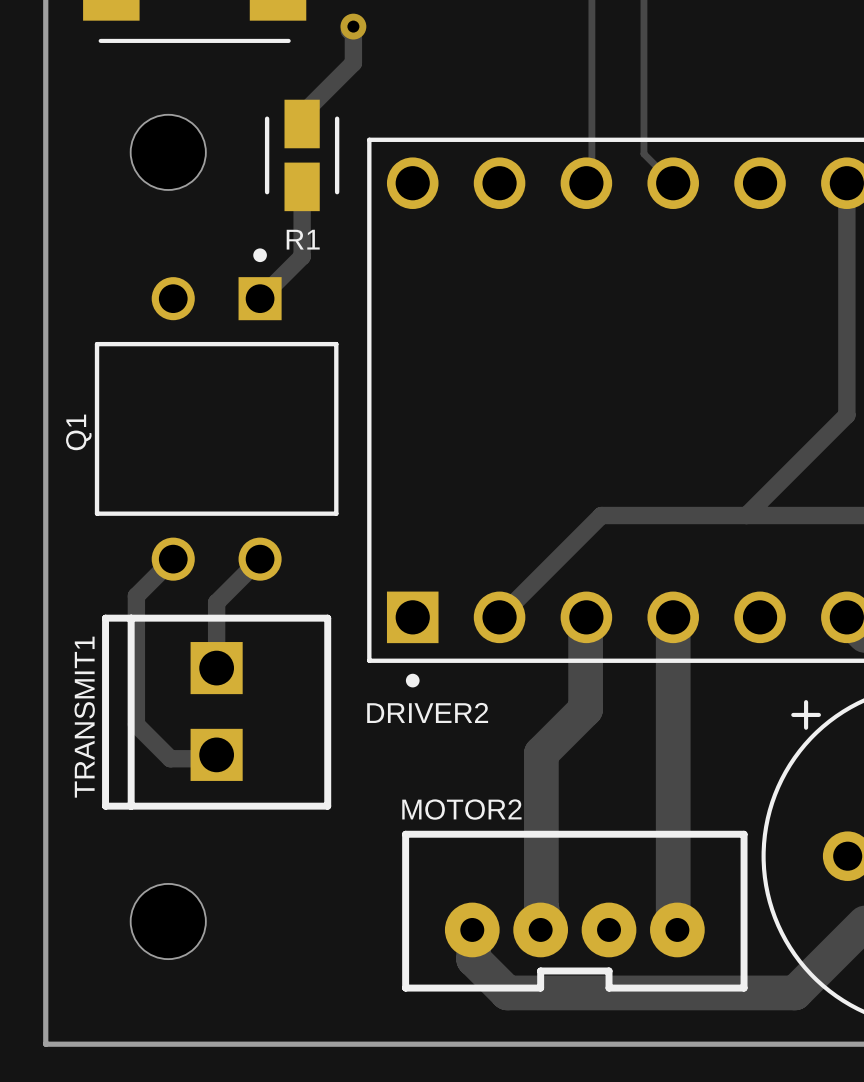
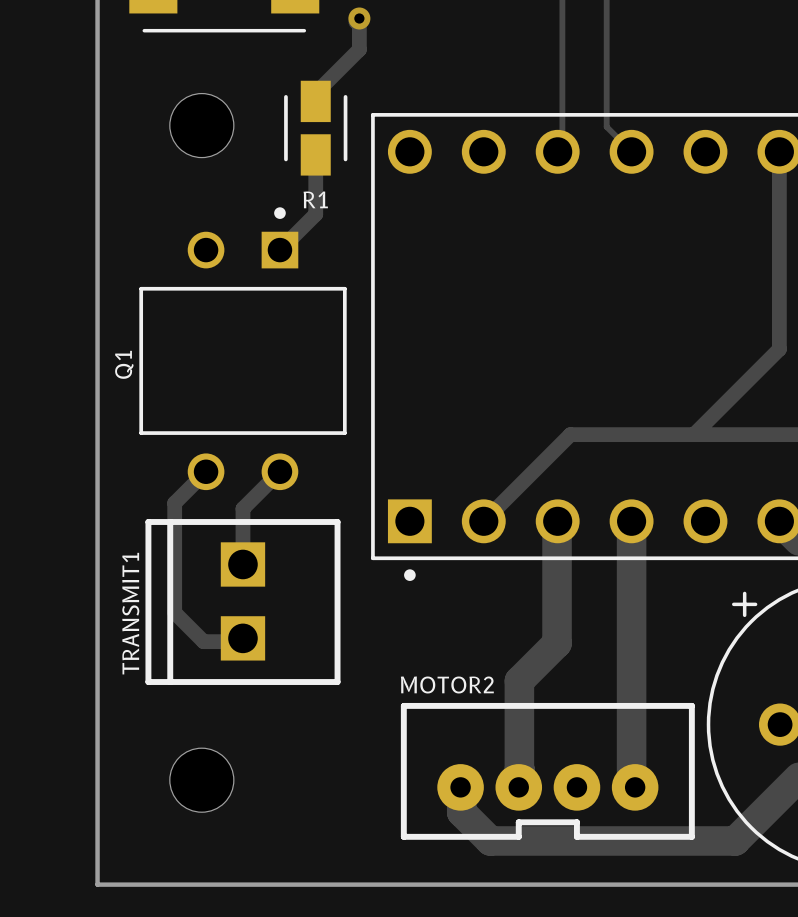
track: (585, 709) (541, 753) (541, 804) -> (557, 599) (557, 643) (519, 680)
DRIVER2 name: DRIVER2 (427, 712) -> none

